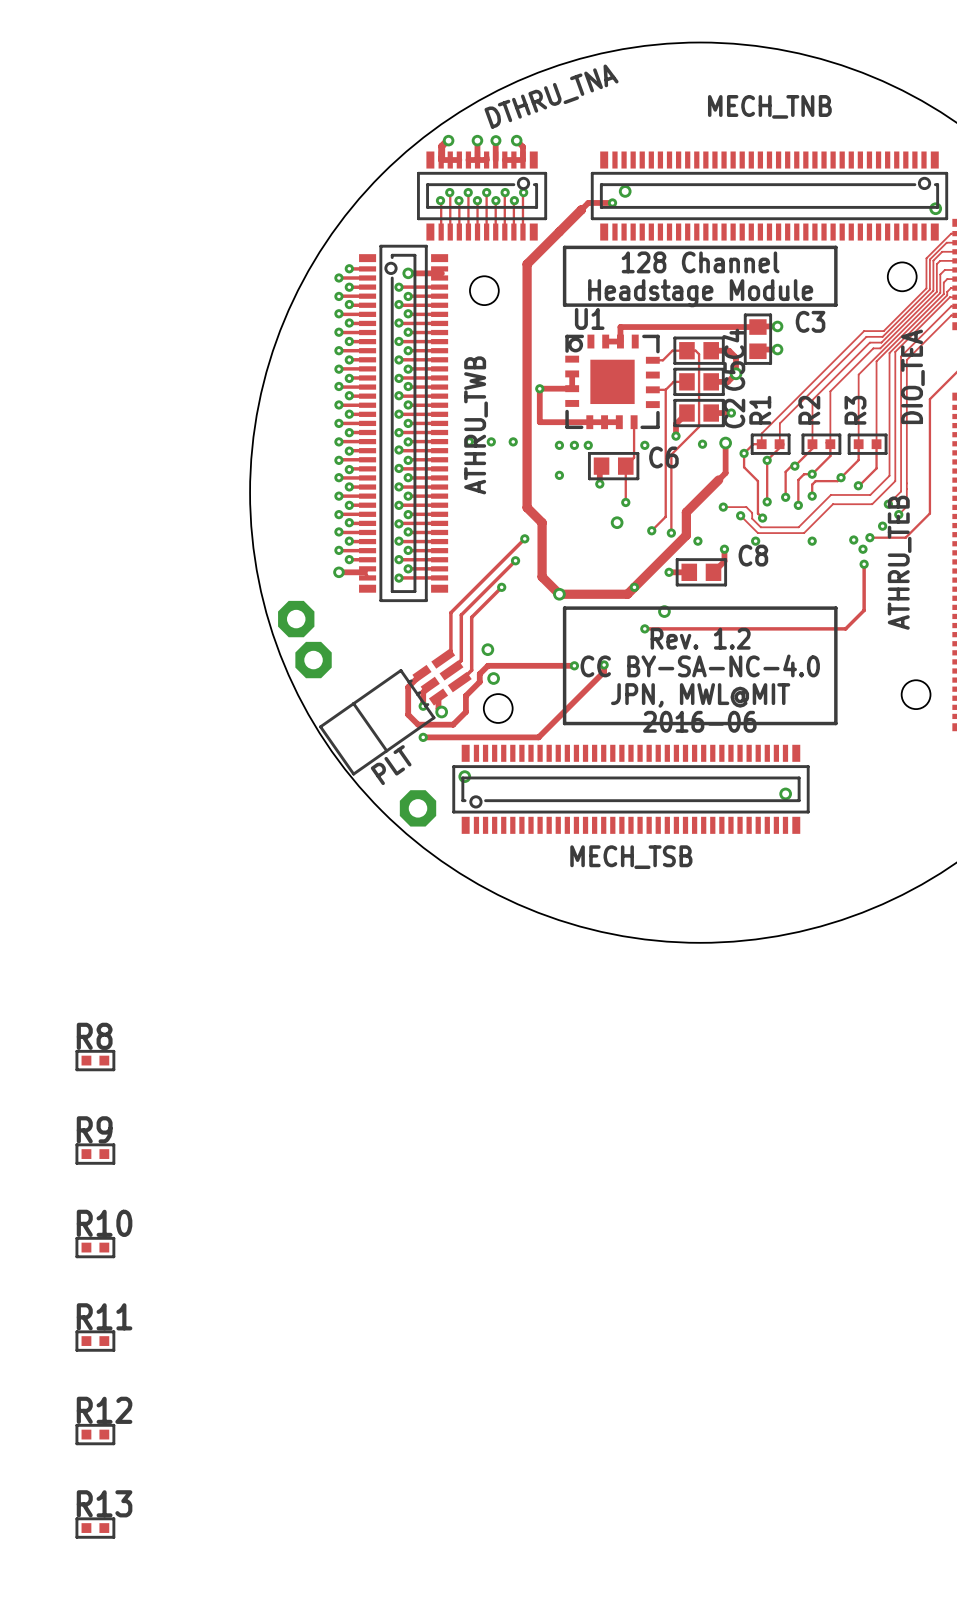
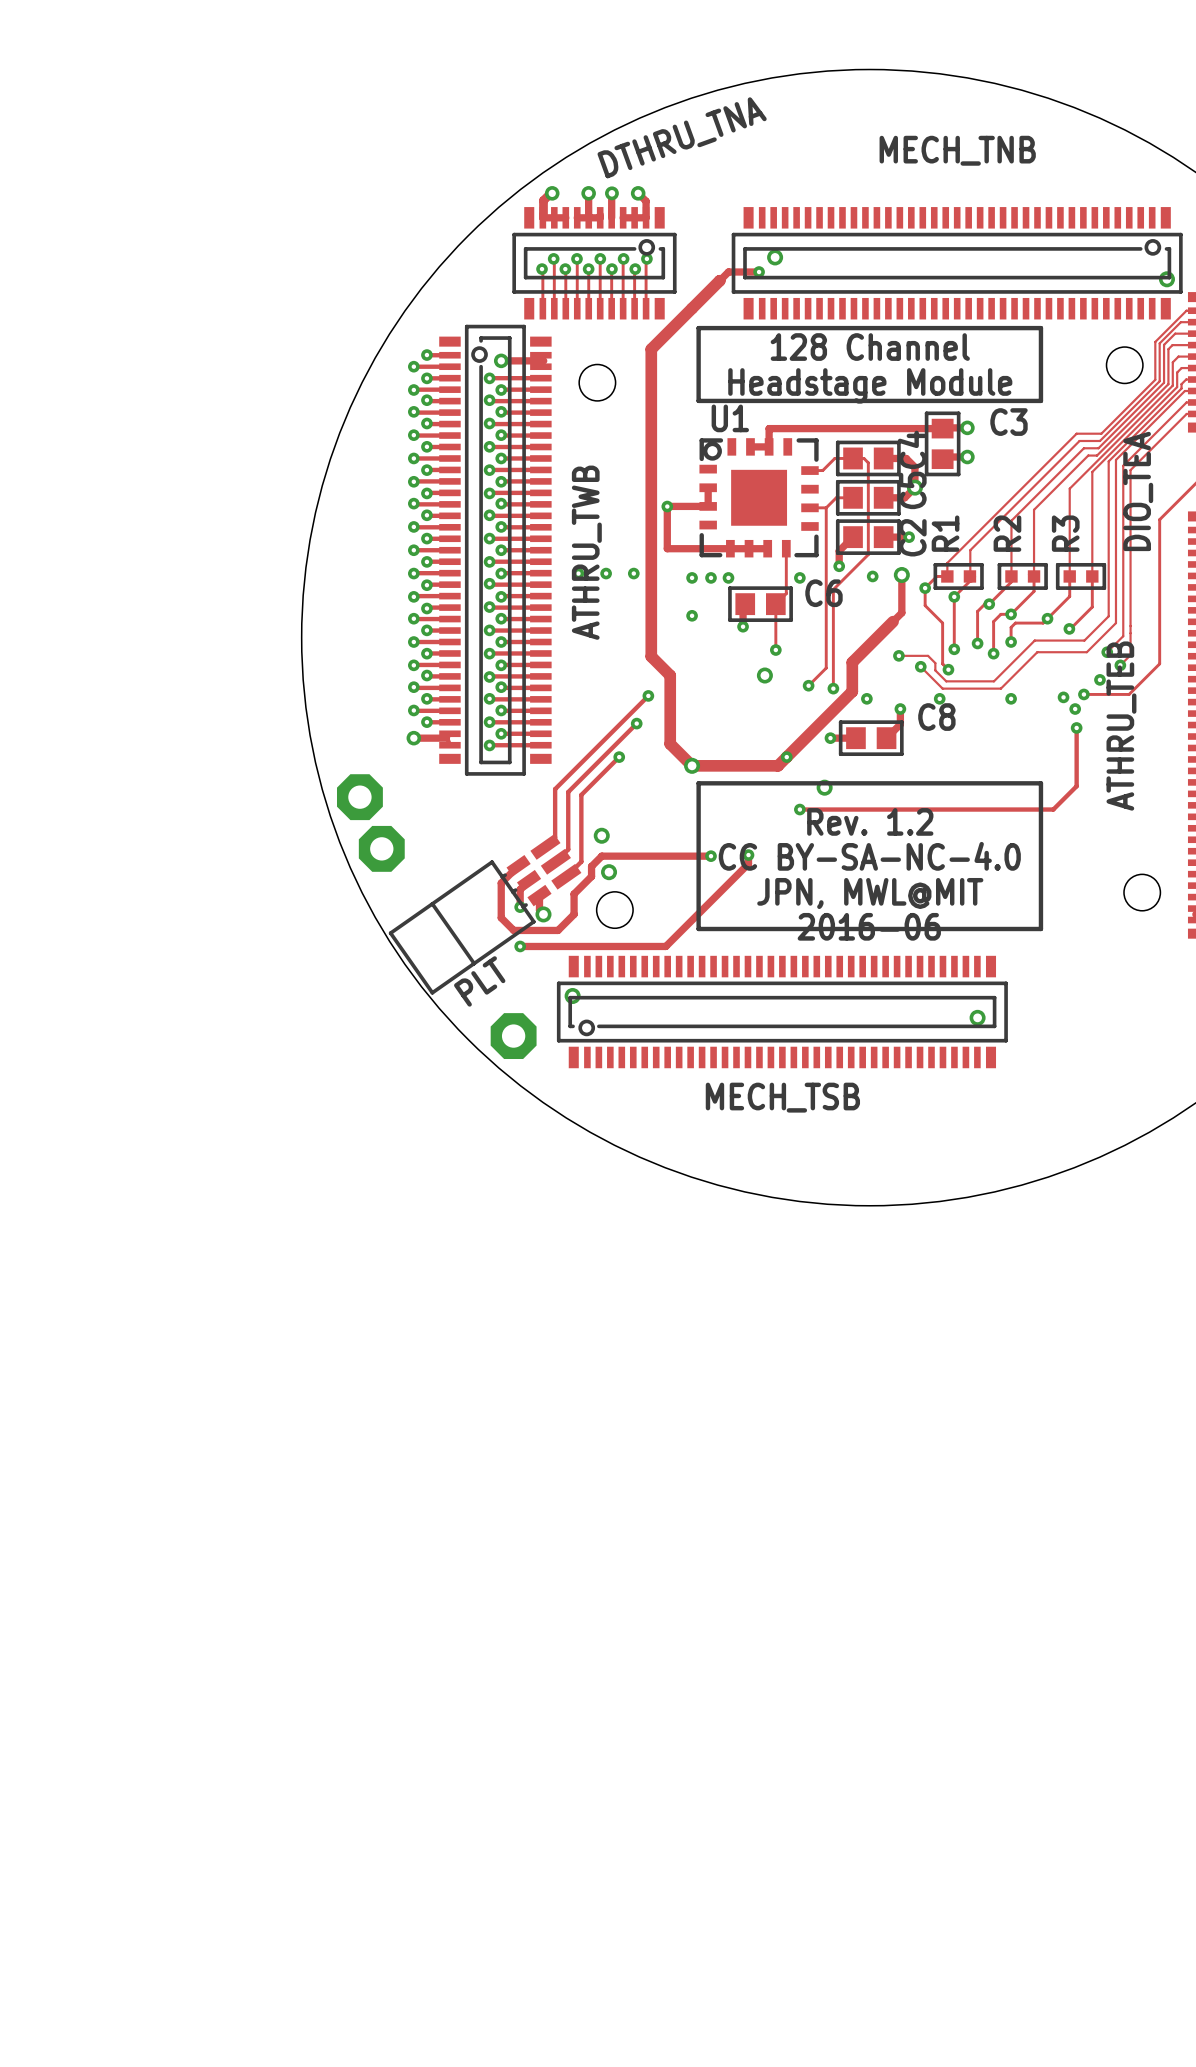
R8: (95, 1060) -> none
R9: (95, 1154) -> none
R10: (95, 1247) -> none
R11: (95, 1341) -> none
R12: (95, 1434) -> none
R13: (95, 1528) -> none

